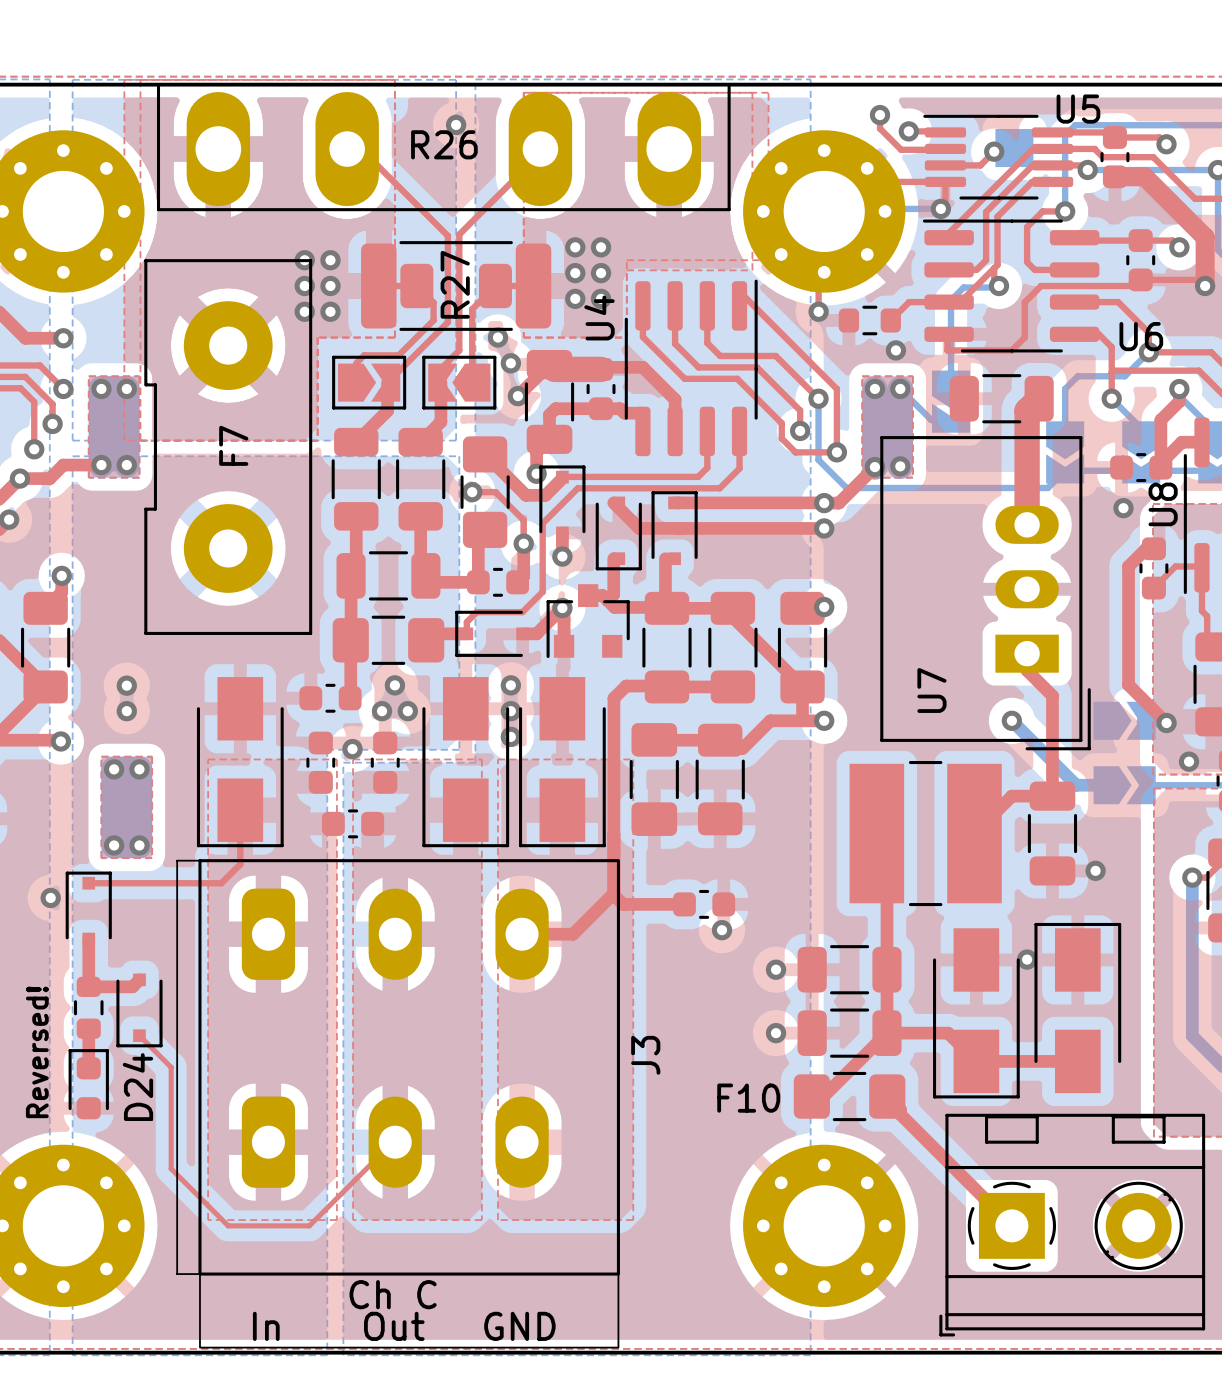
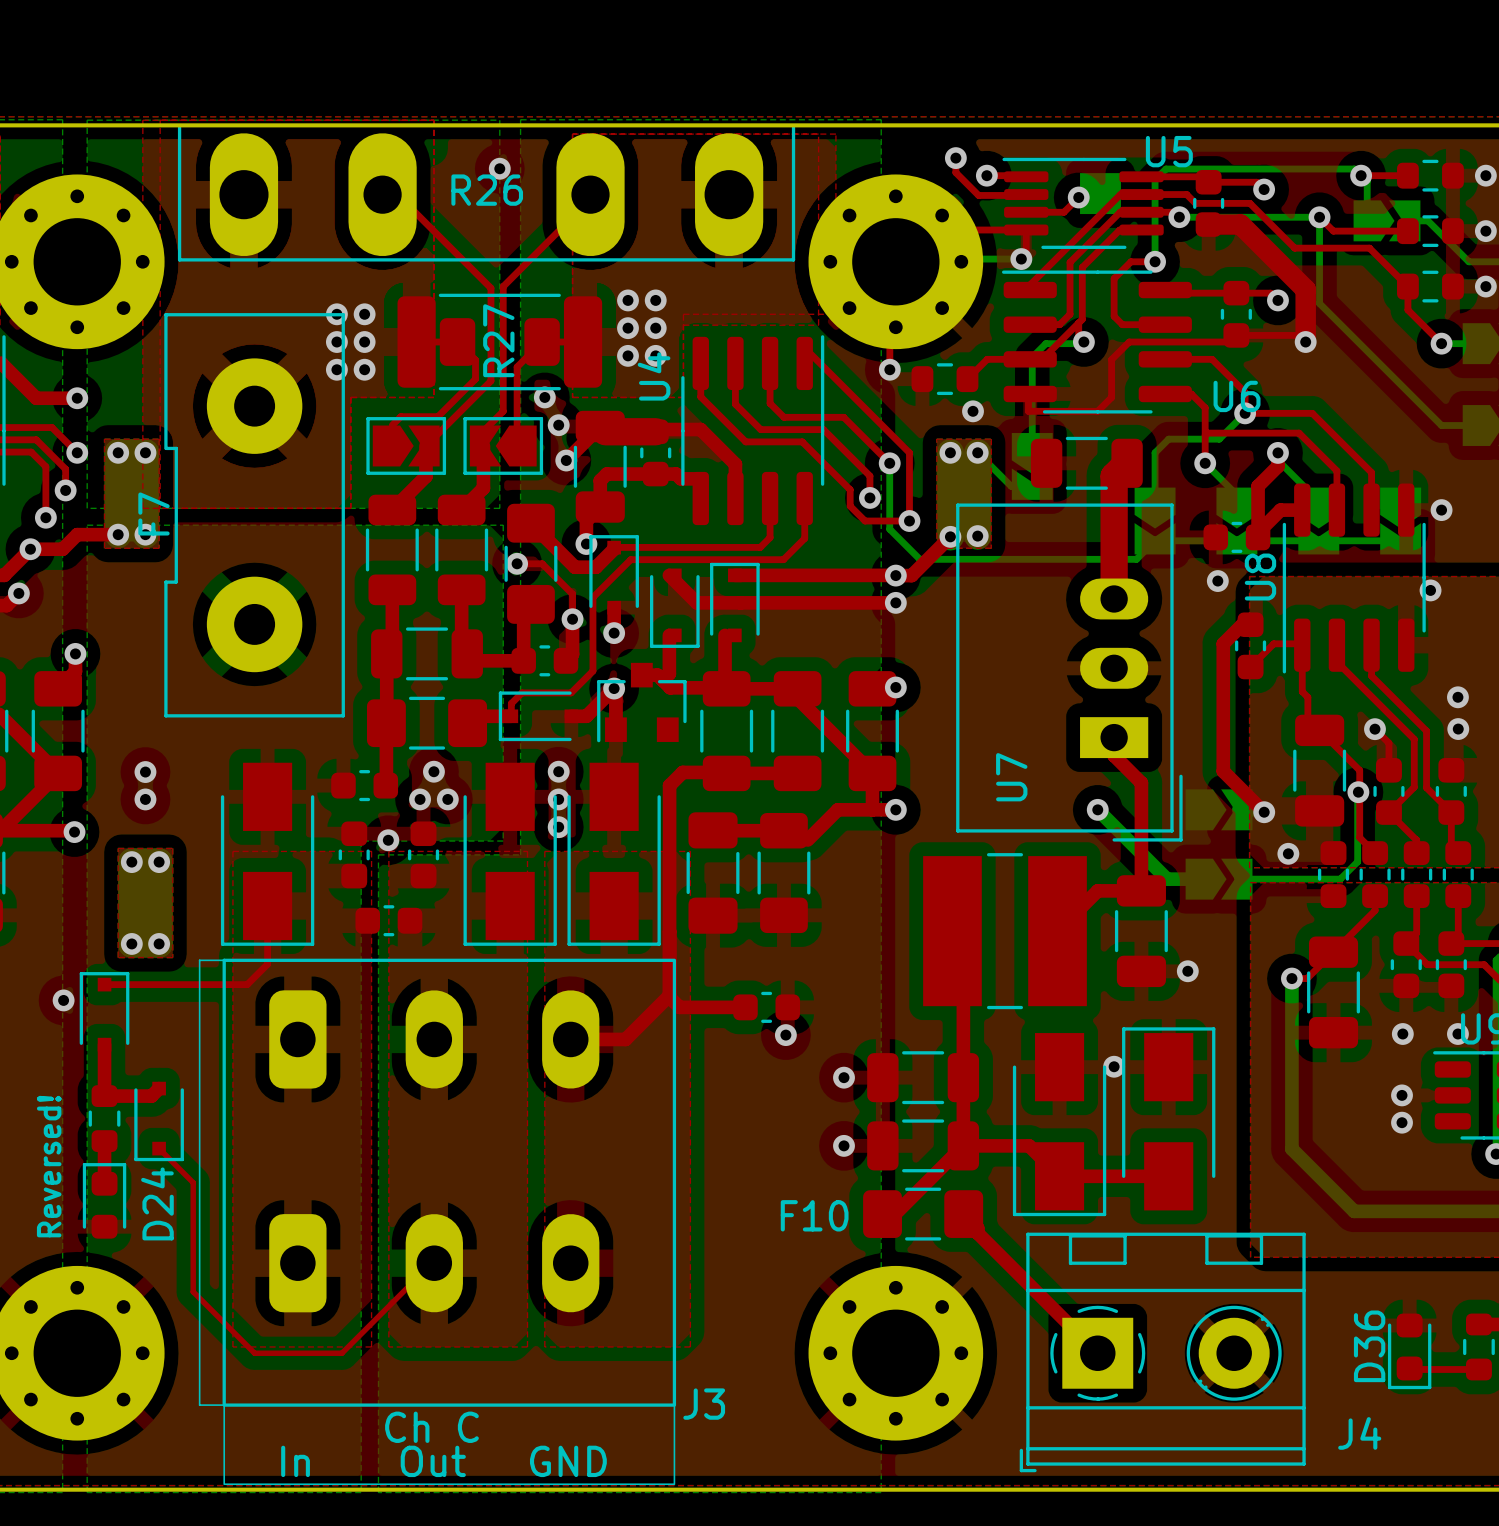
F7 name position: F7 (233, 445) -> F7 (153, 513)
J3 name rotation: 0° (645, 1055) -> 90° clockwise (704, 1404)
J3 name position: J3 (645, 1055) -> J3 (704, 1404)

